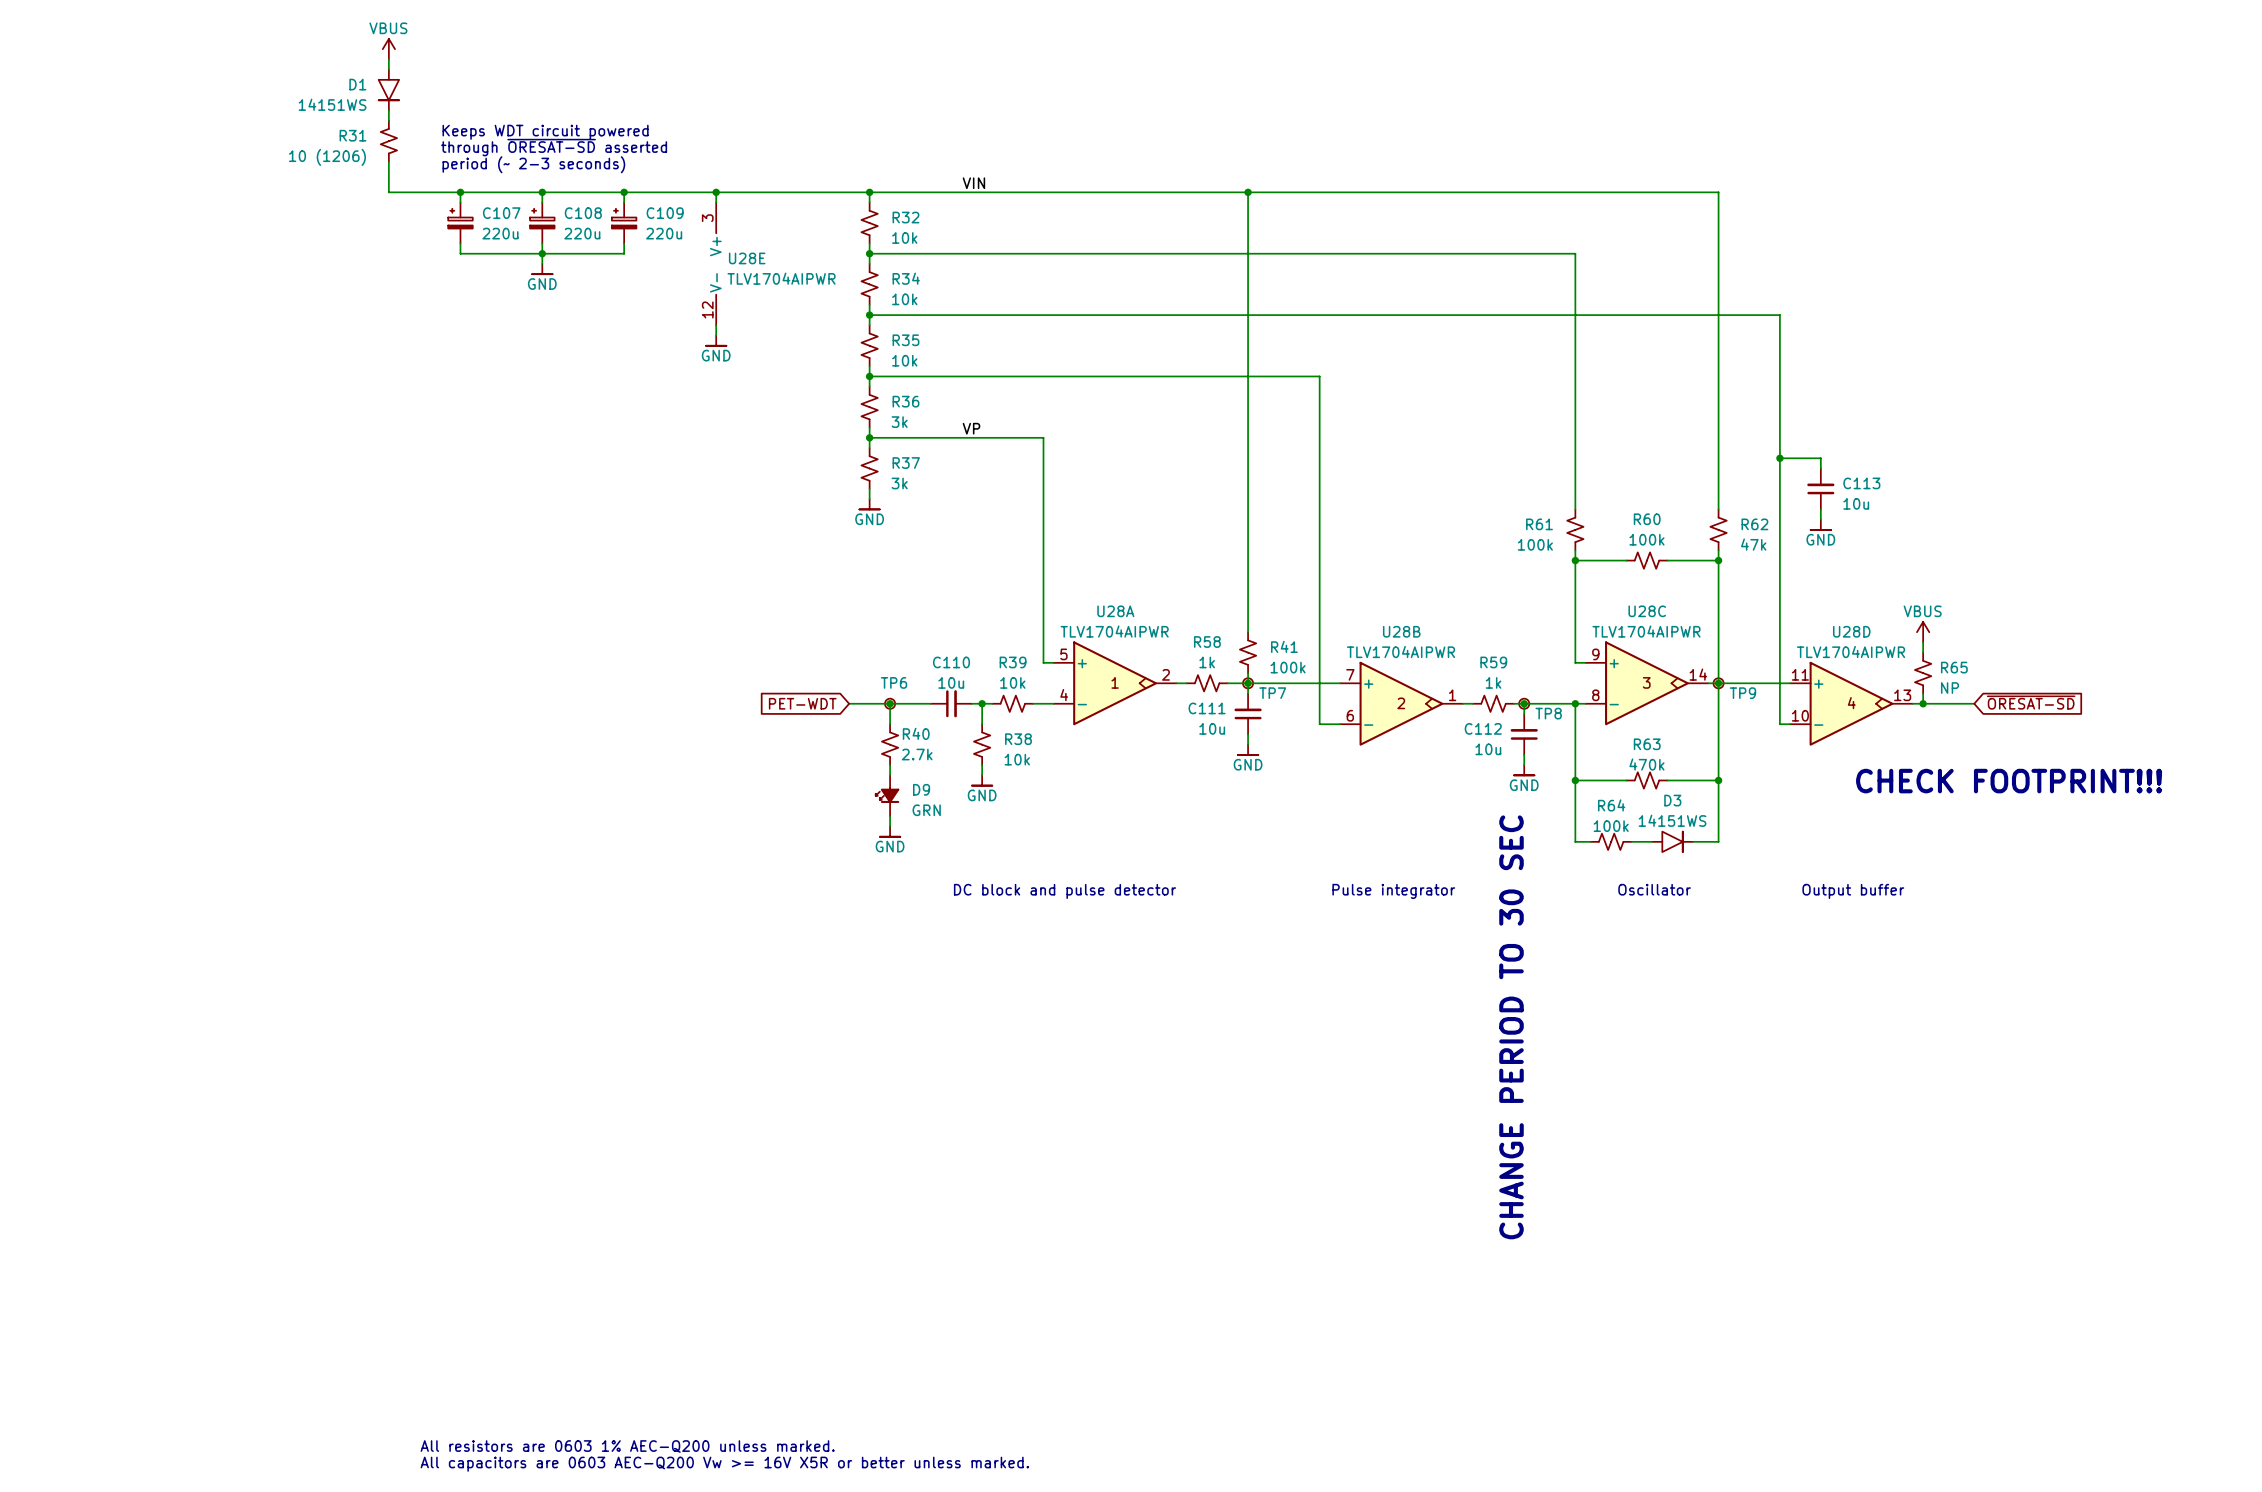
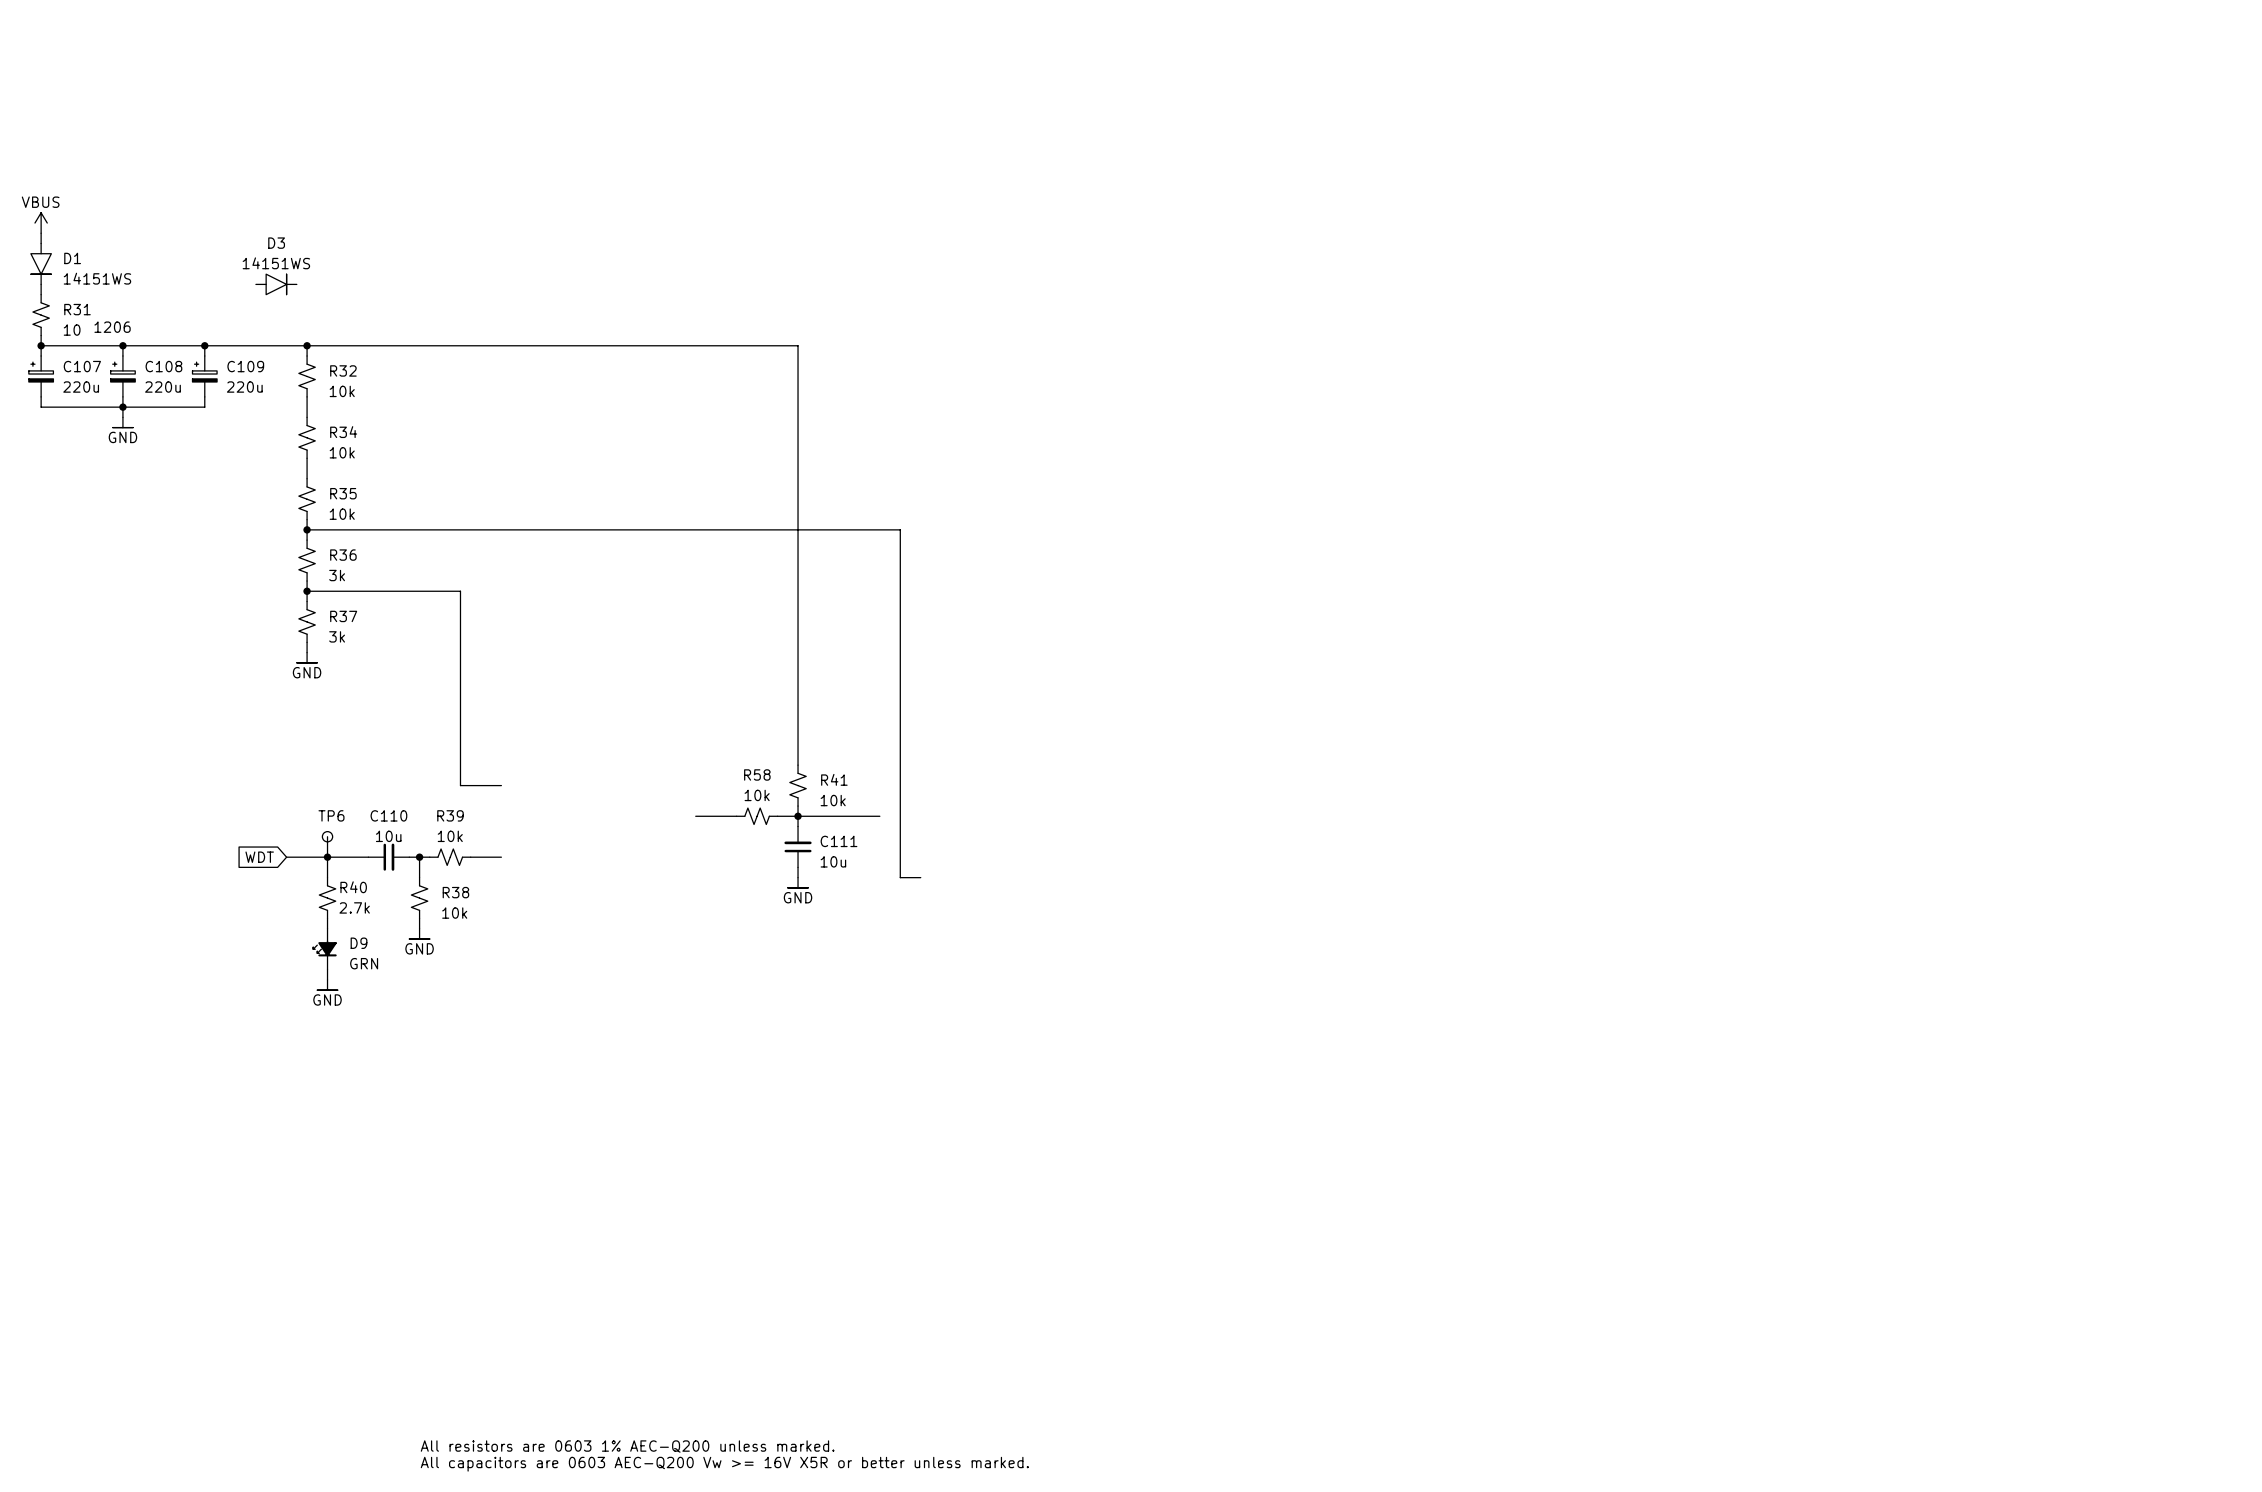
power symbol: VBUS (388, 49) -> none
wire: (388, 59) (388, 69) -> none
D1 name position: D1 (357, 84) -> D1 (72, 258)
D1 position: (388, 90) -> (41, 263)
D1 value position: 14151WS (332, 104) -> 14151WS (97, 278)
wire: (388, 110) (388, 120) -> none
text: Keeps WDT circuit powered (545, 132) -> none
R31 flip: as is (388, 141) -> left-right (41, 315)
R31 position: (388, 141) -> (41, 315)
text: through ~{ORESAT-SD} asserted (554, 147) -> none
R31 value: 10 (1206) (327, 157) -> 10 (72, 330)
wire: (388, 161) (388, 192) (1718, 192) (1718, 509) -> none
text: period (~ 2-3 seconds) (533, 164) -> none
label: VIN (973, 183) -> none
wire: (460, 192) (460, 202) -> none
junction: (460, 192) -> none
wire: (542, 192) (542, 202) -> none
junction: (542, 192) -> none
wire: (624, 192) (624, 202) -> none
junction: (624, 192) -> none
wire: (716, 192) (716, 202) -> none
junction: (716, 192) -> none
wire: (869, 192) (869, 202) -> none
junction: (869, 192) -> none
wire: (1248, 192) (1248, 632) -> none
junction: (1248, 192) -> none
power symbol: none -> VBUS (41, 223)
C107 position: (460, 223) -> (41, 376)
C108 position: (542, 223) -> (122, 376)
C109 position: (624, 223) -> (204, 376)
R32 position: (869, 223) -> (307, 376)
wire: none -> (41, 233) (41, 243)
wire: (460, 243) (460, 253) (624, 253) (624, 243) -> none
wire: (542, 243) (542, 263) -> none
wire: (869, 243) (869, 263) -> none
junction: (542, 253) -> none
wire: (869, 253) (1575, 253) (1575, 509) -> none
junction: (869, 253) -> none
U28E: TLV1704AIPWR (716, 263) -> none
power symbol: GND (542, 269) -> none
wire: none -> (41, 284) (41, 294)
R34 position: (869, 284) -> (307, 437)
wire: (869, 304) (869, 325) -> none
wire: (869, 315) (1779, 315) (1779, 724) (1790, 724) -> none
junction: (869, 315) -> none
wire: (716, 325) (716, 335) -> none
text: none -> 1206 (112, 327)
wire: none -> (41, 335) (41, 356)
power symbol: GND (716, 340) -> none
wire: none -> (41, 345) (798, 345) (798, 765)
junction: none -> (41, 345)
wire: none -> (122, 345) (122, 356)
junction: none -> (122, 345)
wire: none -> (204, 345) (204, 356)
junction: none -> (204, 345)
wire: none -> (307, 345) (307, 356)
junction: none -> (307, 345)
R35 position: (869, 345) -> (307, 499)
wire: (869, 366) (869, 386) -> none
wire: (869, 376) (1319, 376) (1319, 724) (1340, 724) -> none
junction: (869, 376) -> none
wire: none -> (41, 396) (41, 407) (204, 407) (204, 396)
wire: none -> (122, 396) (122, 417)
wire: none -> (307, 396) (307, 417)
junction: none -> (122, 407)
R36 position: (869, 407) -> (307, 560)
power symbol: none -> GND (122, 422)
wire: (869, 427) (869, 448) -> none
label: VP (971, 428) -> none
wire: (869, 437) (1043, 437) (1043, 662) (1053, 662) -> none
junction: (869, 437) -> none
wire: none -> (307, 458) (307, 478)
wire: (1779, 458) (1820, 458) (1820, 468) -> none
junction: (1779, 458) -> none
R37 position: (869, 468) -> (307, 621)
wire: (869, 488) (869, 499) -> none
C113: 10u (1820, 488) -> none
power symbol: GND (869, 504) -> none
wire: (1820, 509) (1820, 519) -> none
wire: none -> (307, 519) (307, 540)
power symbol: GND (1820, 524) -> none
wire: none -> (307, 529) (900, 529) (900, 877) (920, 877)
junction: none -> (307, 529)
R61: 100k (1575, 529) -> none
R62: 47k (1718, 529) -> none
wire: (1575, 550) (1575, 662) (1585, 662) -> none
wire: (1718, 550) (1718, 841) (1692, 841) -> none
wire: (1575, 560) (1626, 560) -> none
junction: (1575, 560) -> none
R60: 100k (1646, 560) -> none
wire: (1667, 560) (1718, 560) -> none
junction: (1718, 560) -> none
wire: none -> (307, 581) (307, 601)
wire: none -> (307, 591) (460, 591) (460, 785) (501, 785)
junction: none -> (307, 591)
power symbol: VBUS (1923, 632) -> none
wire: none -> (307, 642) (307, 652)
wire: (1923, 642) (1923, 652) -> none
R41 position: (1248, 652) -> (798, 785)
power symbol: none -> GND (307, 657)
R58 value: 1k (1207, 662) -> 10k (757, 795)
R41 value: 100k (1288, 667) -> 10k (833, 800)
wire: (1248, 673) (1248, 693) -> none
R65: NP (1923, 673) -> none
U28A: TLV1704AIPWR (1115, 683) -> none
wire: (1176, 683) (1186, 683) -> none
R58 position: (1207, 683) -> (757, 816)
wire: (1227, 683) (1340, 683) -> none
junction: (1248, 683) -> none
TP7: (1248, 683) -> none
U28C: TLV1704AIPWR (1646, 683) -> none
wire: (1708, 683) (1790, 683) -> none
junction: (1718, 683) -> none
TP9: (1718, 683) -> none
wire: (1923, 693) (1923, 703) -> none
global label: ~{ORESAT-SD} (2031, 702) -> none
global label: PET-WDT (802, 703) -> none
wire: (849, 703) (930, 703) -> none
wire: (890, 703) (890, 724) -> (798, 806) (798, 826)
junction: (890, 703) -> none
TP6 position: (890, 703) -> (327, 836)
C110 position: (951, 703) -> (388, 857)
wire: (971, 703) (992, 703) -> none
wire: (982, 703) (982, 724) -> none
junction: (982, 703) -> none
R39 position: (1012, 703) -> (450, 857)
wire: (1033, 703) (1053, 703) -> none
U28B: TLV1704AIPWR (1401, 703) -> none
wire: (1462, 703) (1473, 703) -> none
R59: 1k (1493, 703) -> none
wire: (1513, 703) (1585, 703) -> none
wire: (1524, 703) (1524, 713) -> none
junction: (1524, 703) -> none
TP8: (1524, 703) -> none
wire: (1575, 703) (1575, 841) (1590, 841) -> none
junction: (1575, 703) -> none
U28D: TLV1704AIPWR (1851, 703) -> none
wire: (1912, 703) (1974, 703) -> none
junction: (1923, 703) -> none
C111 name position: C111 (1207, 708) -> C111 (839, 841)
C111 position: (1248, 713) -> (798, 846)
C111 value position: 10u (1212, 728) -> 10u (833, 861)
wire: (1248, 734) (1248, 744) -> none
C112: 10u (1524, 734) -> none
R40 position: (890, 744) -> (327, 898)
R38 position: (982, 744) -> (419, 898)
power symbol: GND (1248, 749) -> none
wire: (1524, 754) (1524, 765) -> none
wire: (890, 765) (890, 775) -> (798, 867) (798, 877)
wire: (982, 765) (982, 775) -> none
power symbol: GND (1524, 770) -> none
power symbol: GND (982, 780) -> none
wire: (1575, 780) (1626, 780) -> none
junction: (1575, 780) -> none
R63: 470k (1646, 780) -> none
wire: (1667, 780) (1718, 780) -> none
junction: (1718, 780) -> none
text: CHECK FOOTPRINT!!! (2009, 781) -> none
D9 position: (887, 795) -> (324, 949)
wire: none -> (695, 816) (736, 816)
wire: none -> (777, 816) (879, 816)
junction: none -> (798, 816)
wire: (890, 816) (890, 826) -> none
power symbol: GND (890, 831) -> none
wire: none -> (327, 836) (327, 877)
R64: 100k (1611, 841) -> none
wire: (1631, 841) (1652, 841) -> none
D3 position: (1672, 841) -> (276, 284)
global label: none -> WDT (259, 857)
wire: none -> (286, 857) (368, 857)
junction: none -> (327, 857)
wire: none -> (409, 857) (429, 857)
wire: none -> (419, 857) (419, 877)
junction: none -> (419, 857)
wire: none -> (470, 857) (501, 857)
power symbol: none -> GND (798, 882)
text: Oscillator (1654, 889) -> none
text: DC block and pulse detector (1065, 891) -> none
text: Pulse integrator (1393, 891) -> none
text: Output buffer (1853, 891) -> none
wire: none -> (327, 918) (327, 928)
wire: none -> (419, 918) (419, 928)
power symbol: none -> GND (419, 933)
wire: none -> (327, 969) (327, 979)
power symbol: none -> GND (327, 985)
text: CHANGE PERIOD TO 30 SEC (1511, 1027) -> none

